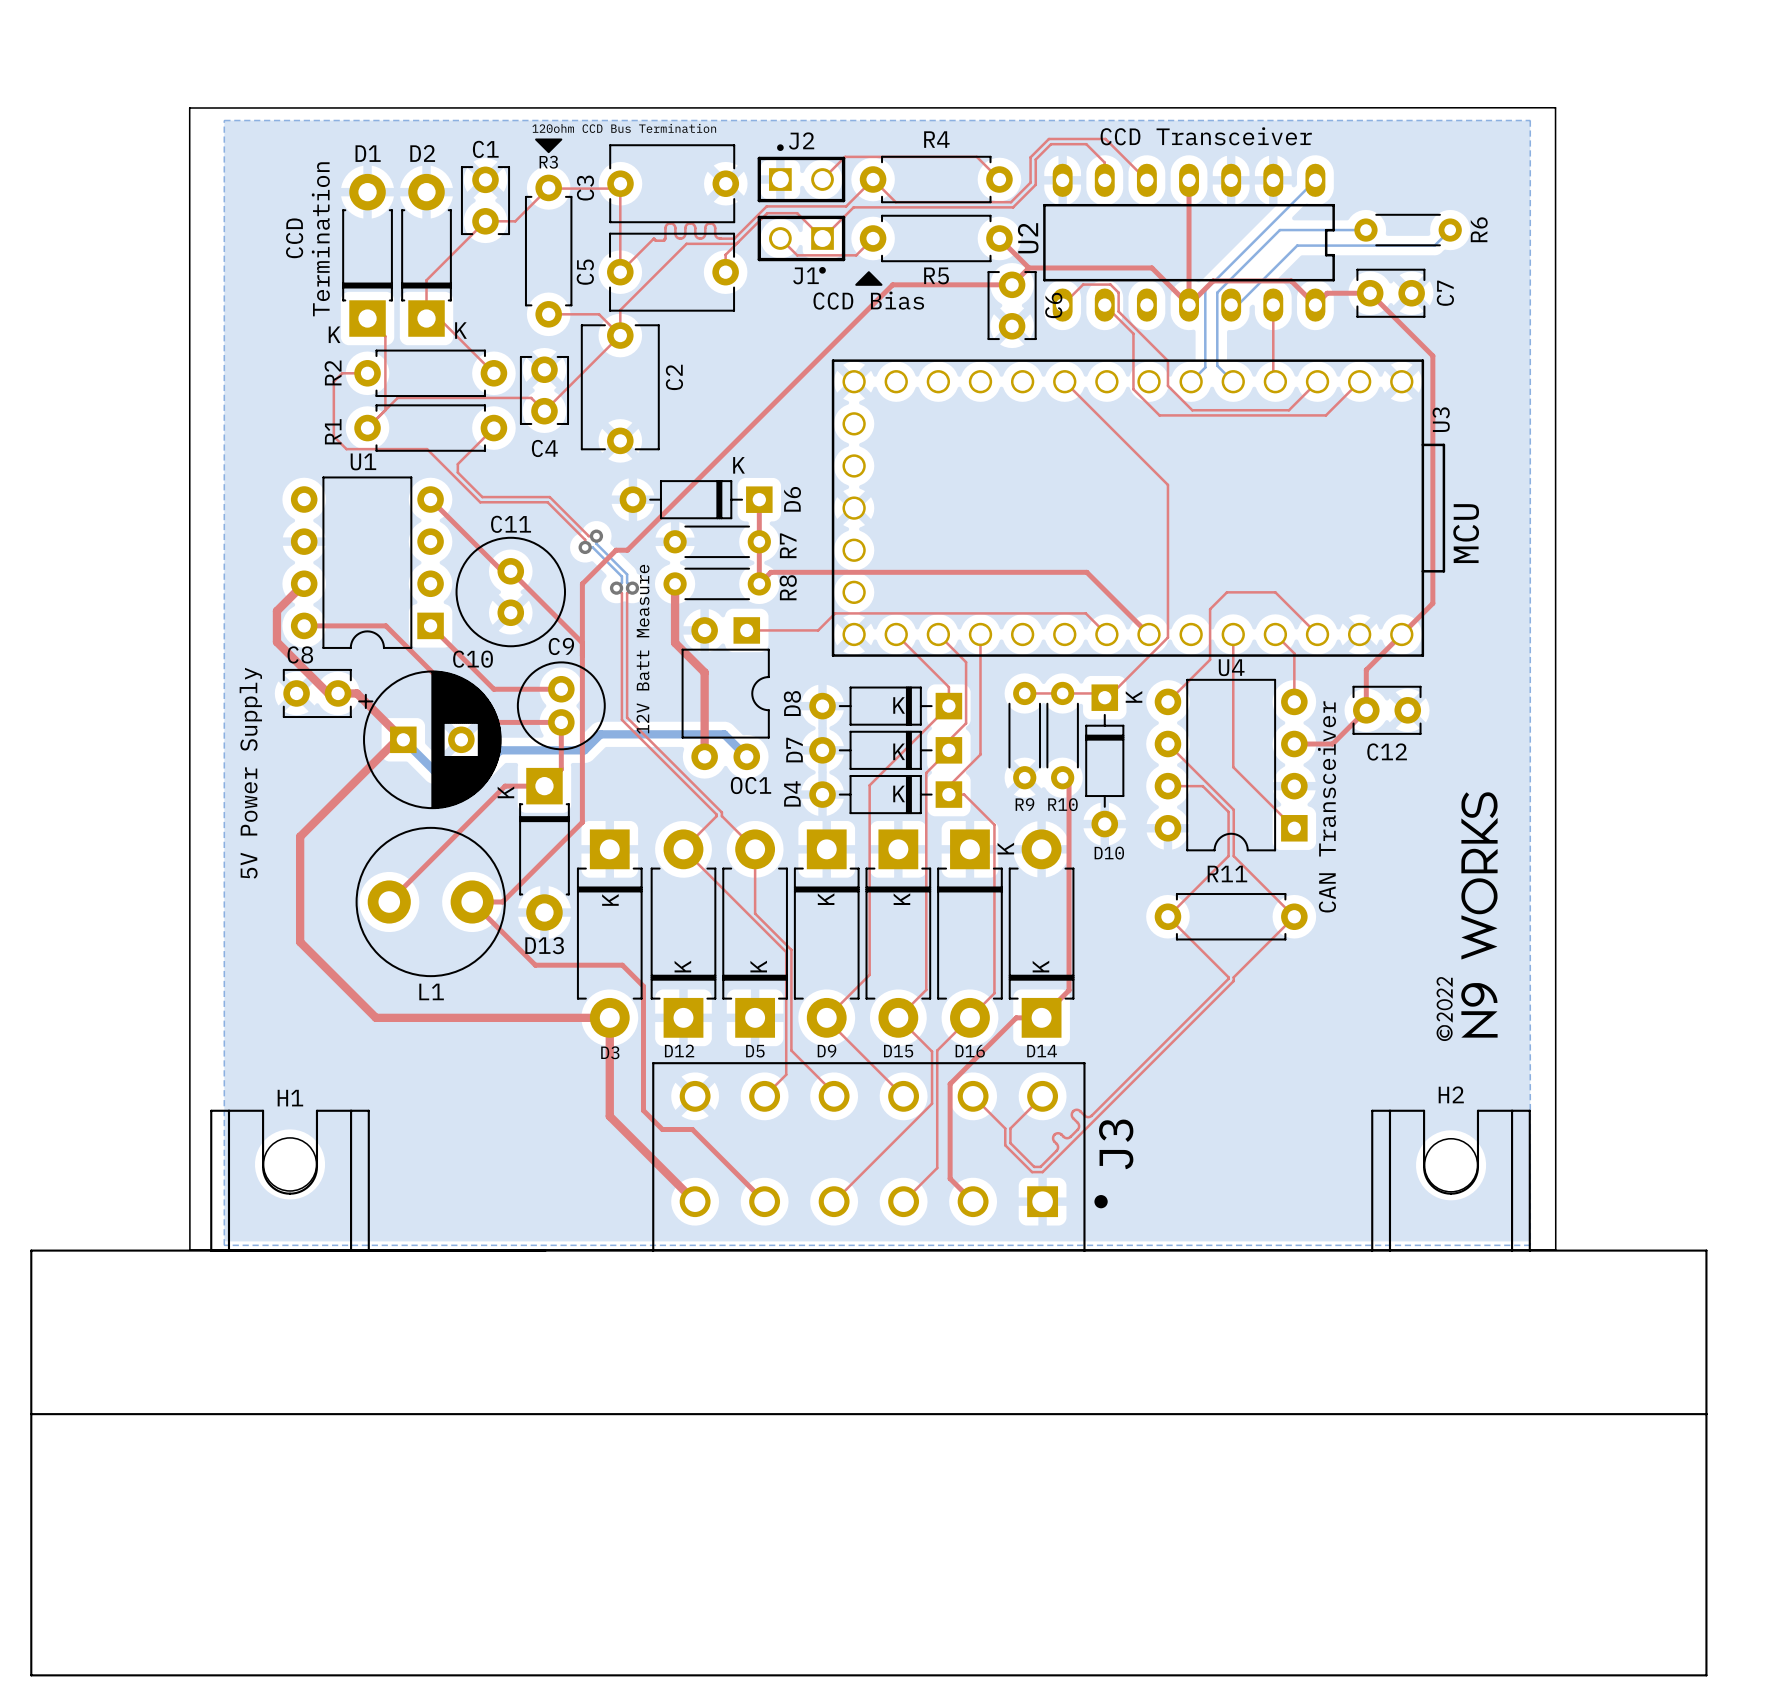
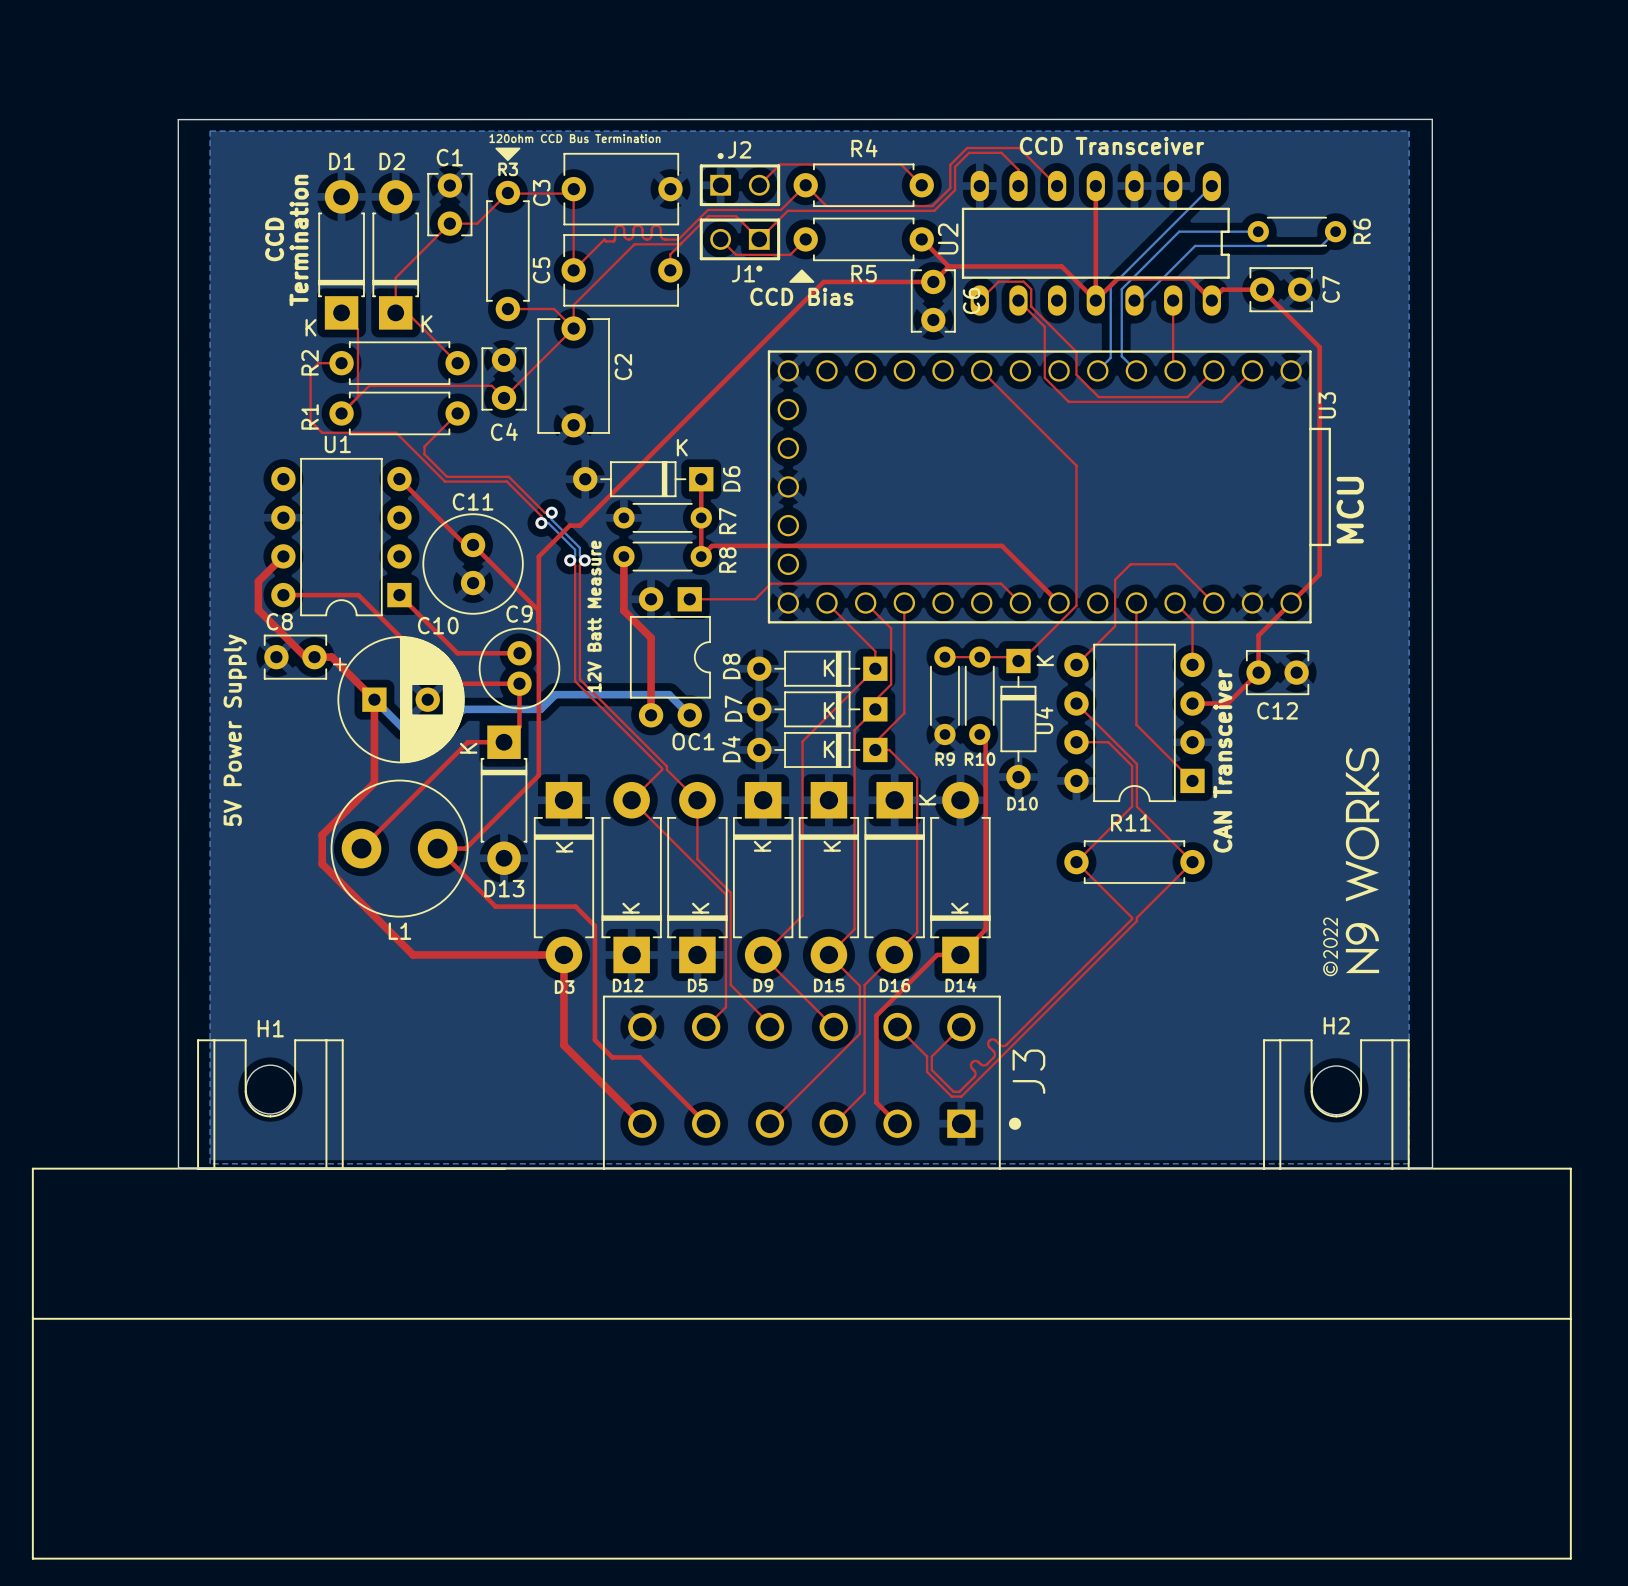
U4 name rotation: 0° (1231, 667) -> 90° counterclockwise (1044, 720)
U4 name position: U4 (1231, 667) -> U4 (1044, 720)
top track: (403, 739) (397, 739) (300, 836) (300, 942) (375, 1017) (445, 1017) -> (374, 699) (374, 782) (322, 835) (322, 864) (413, 954)

